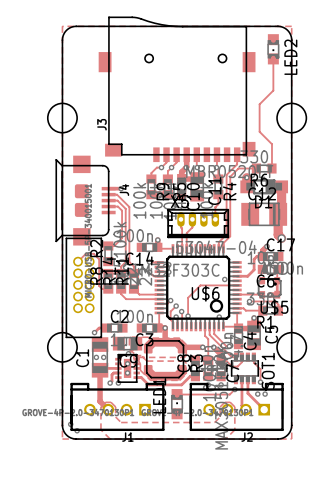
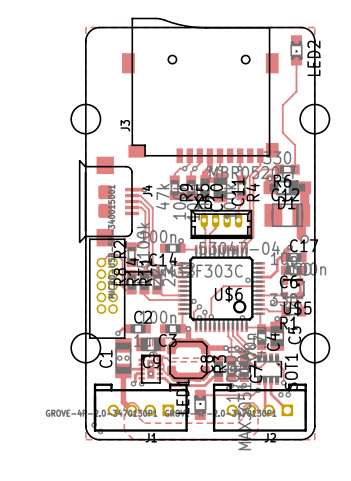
R9 value: 100k (139, 200) -> 47k (162, 196)

